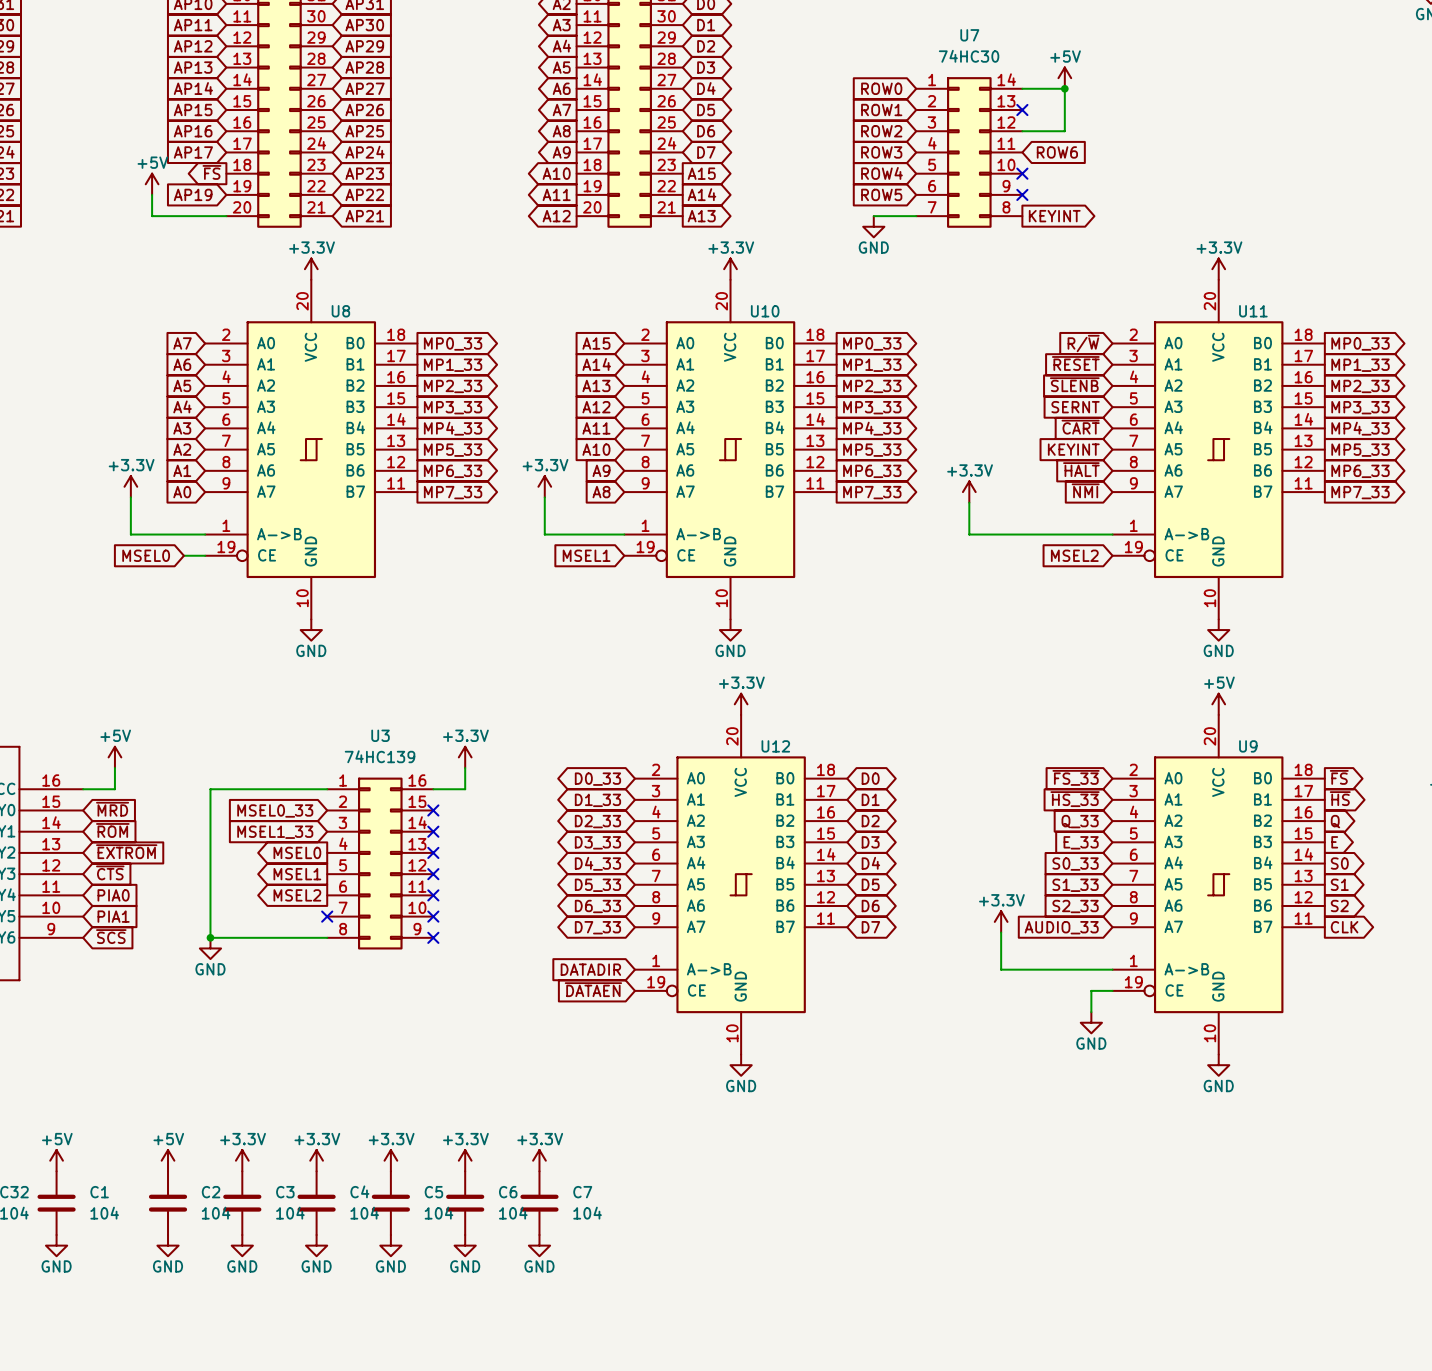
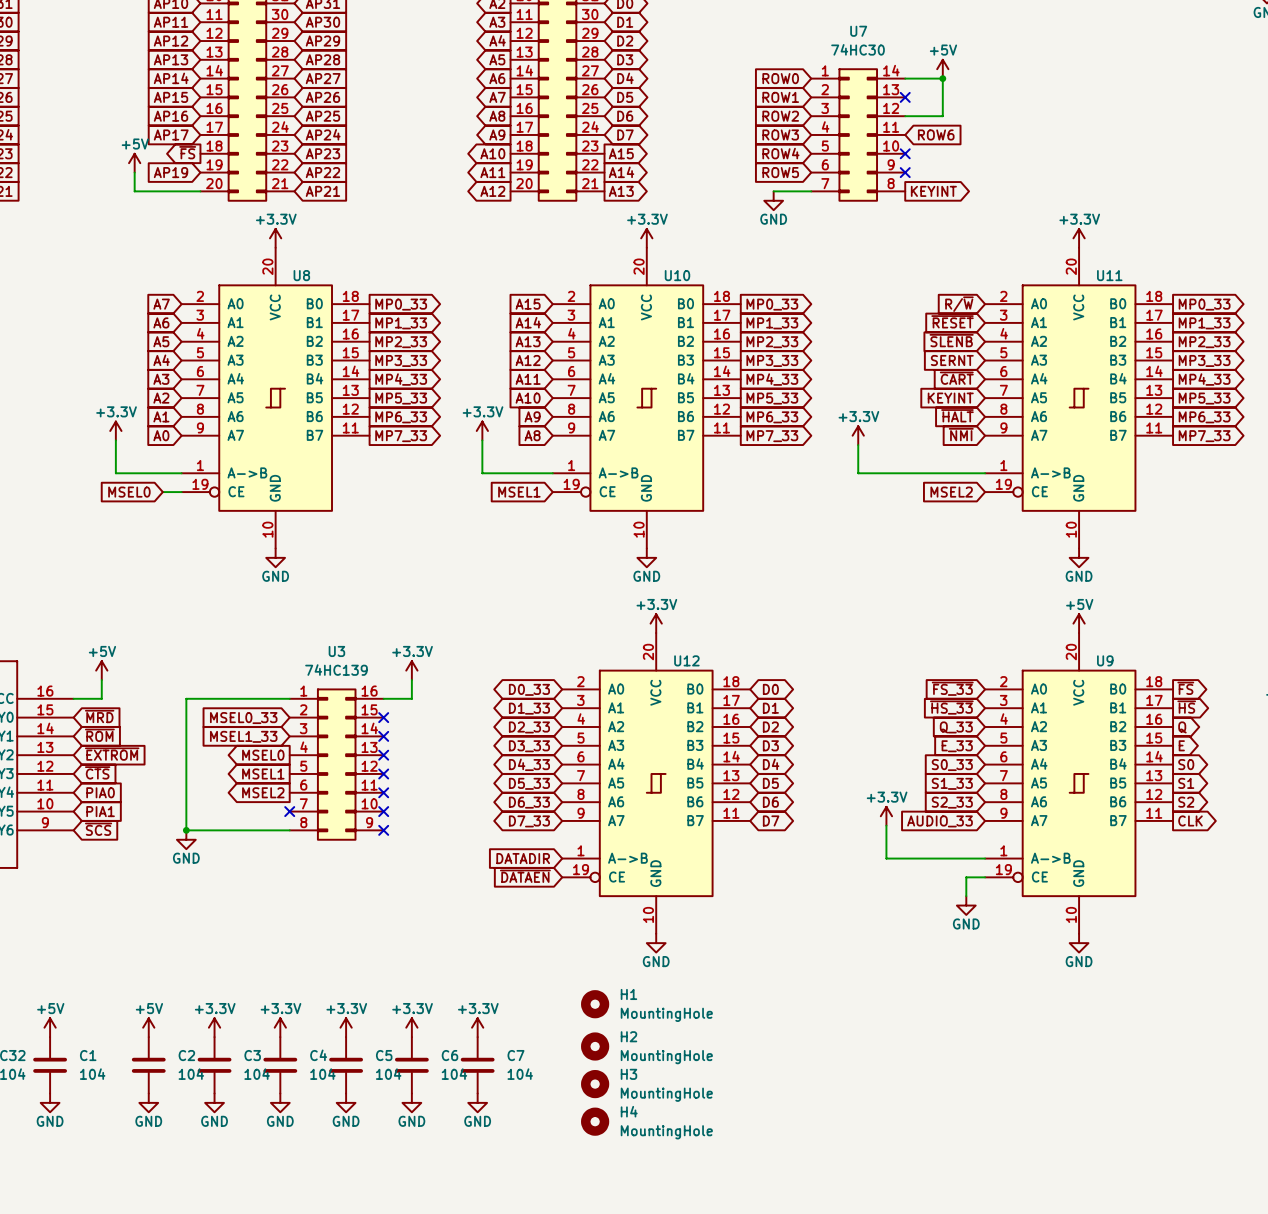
H1: none -> MountingHole (595, 1004)
H2: none -> MountingHole (595, 1046)
H3: none -> MountingHole (595, 1084)
H4: none -> MountingHole (595, 1121)

